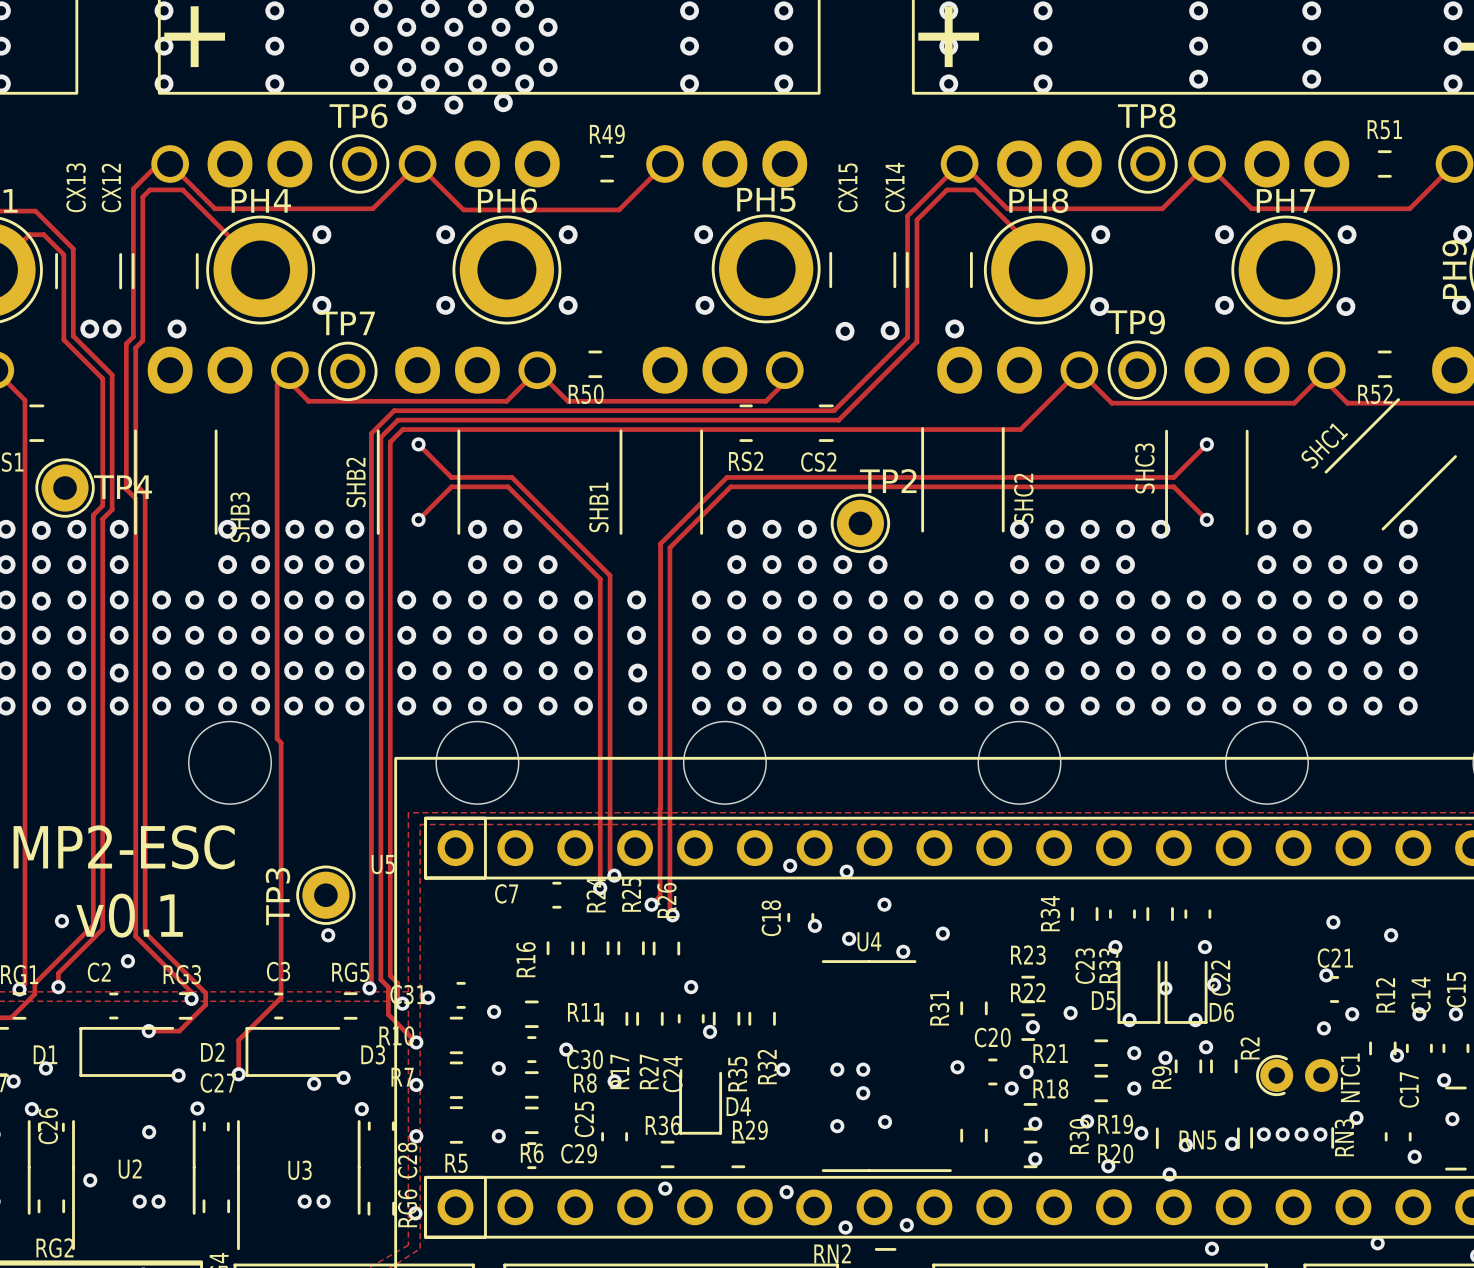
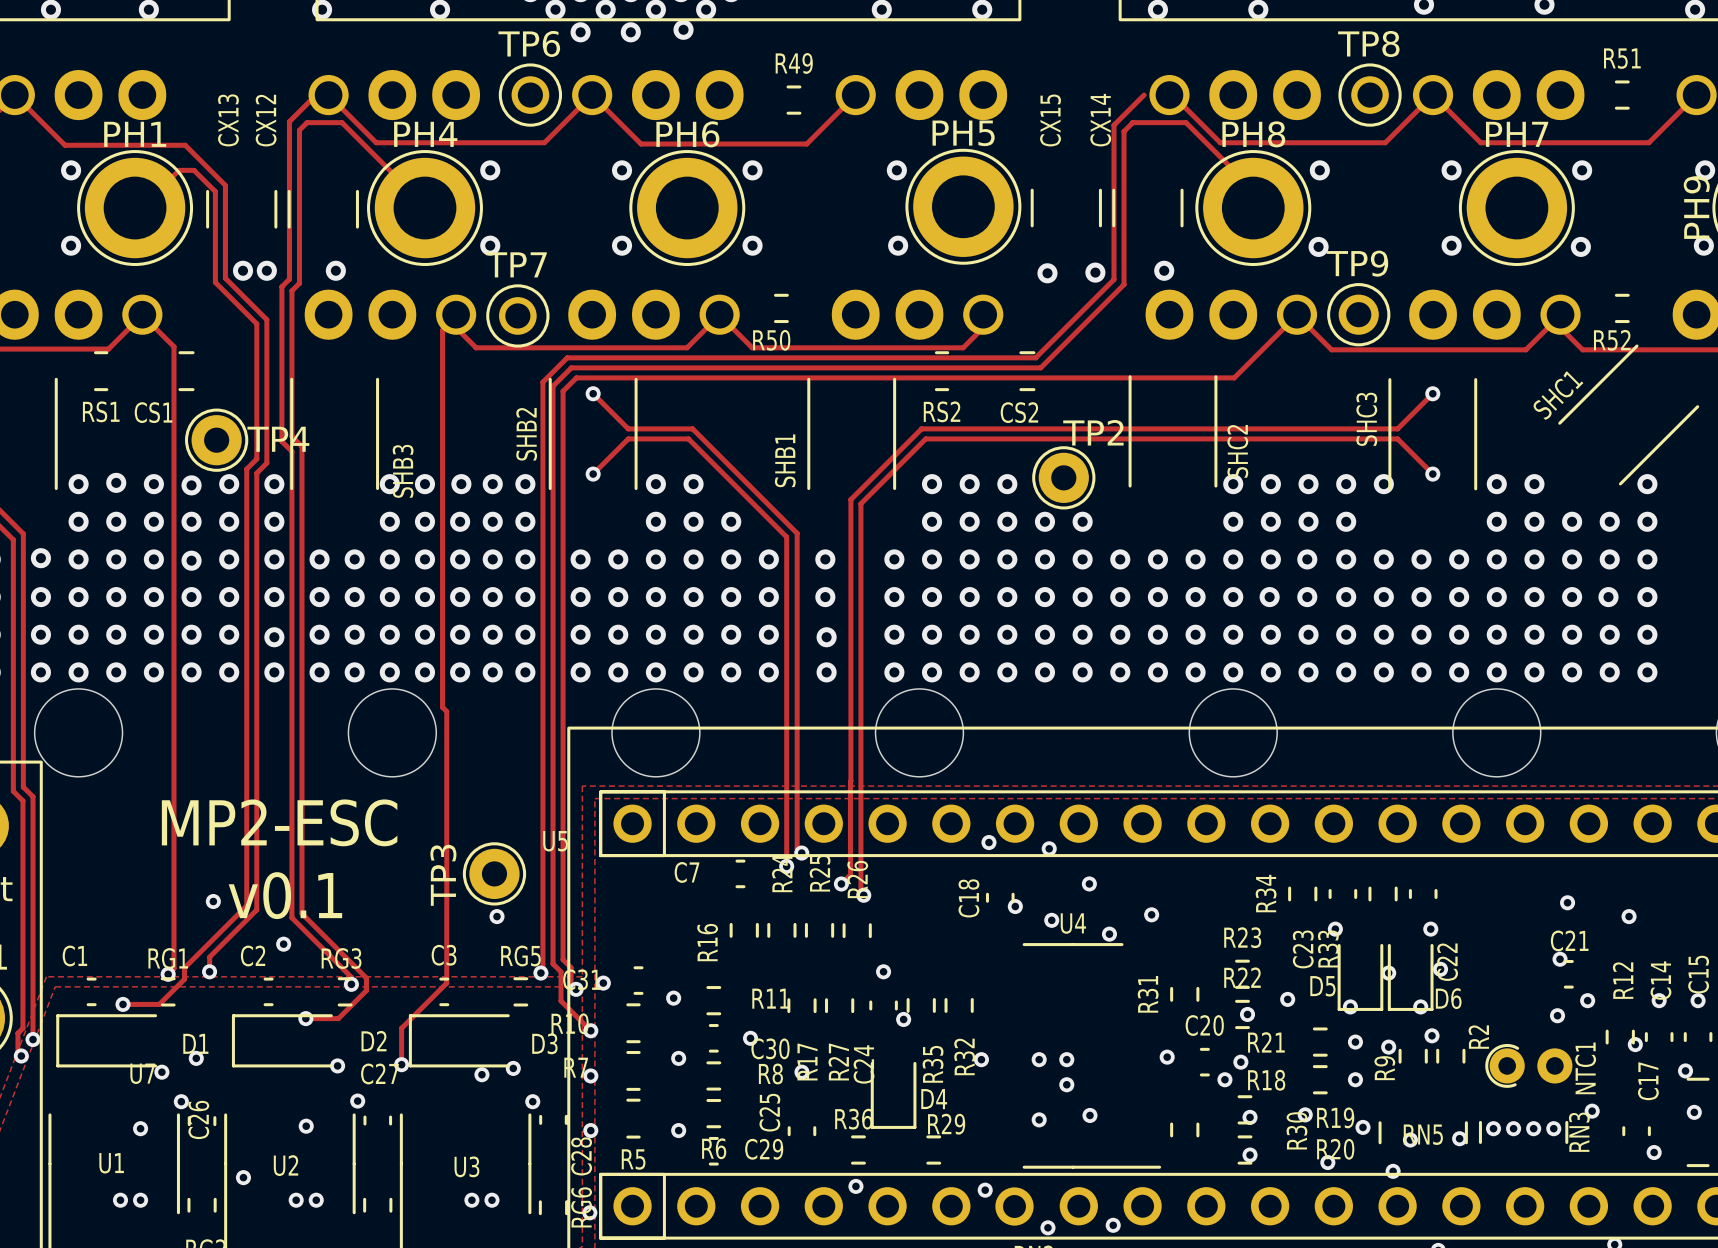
track: (959, 163) (907, 216) -> (1144, 95) (1114, 125) (1114, 150)
track: (947, 189) (916, 219) -> (1156, 122) (1132, 122) (1124, 131) (1124, 154)

